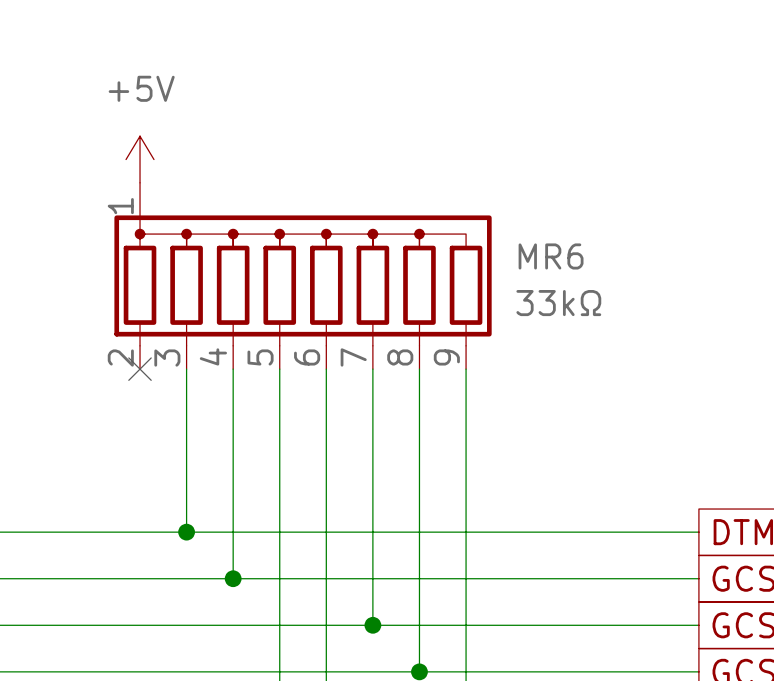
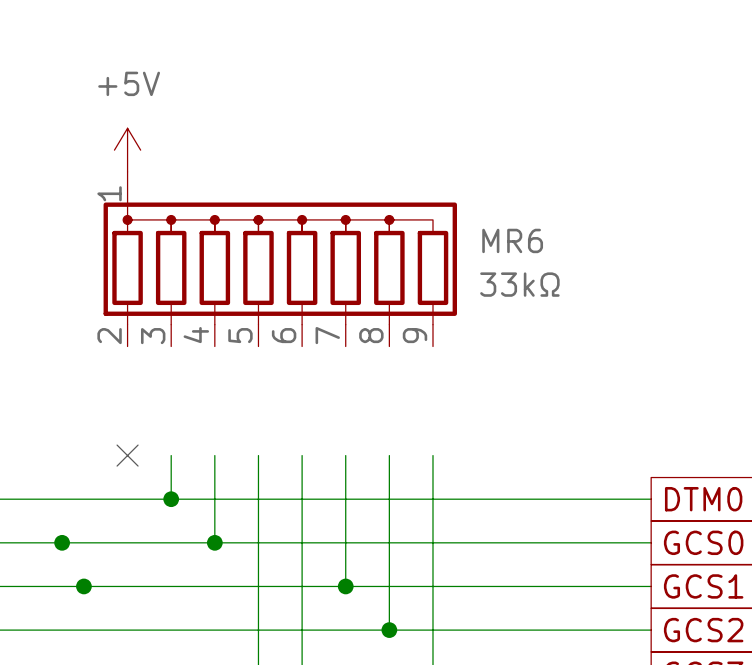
no-connect mark: (140, 369) -> none
wire: (186, 369) (186, 485) -> none
wire: (233, 369) (233, 485) -> none
wire: (279, 369) (279, 485) -> none
wire: (326, 369) (326, 485) -> none
wire: (372, 369) (372, 485) -> none
wire: (419, 369) (419, 485) -> none
wire: (466, 369) (466, 485) -> none
no-connect mark: none -> (127, 455)
junction: none -> (62, 542)
junction: none -> (83, 586)

